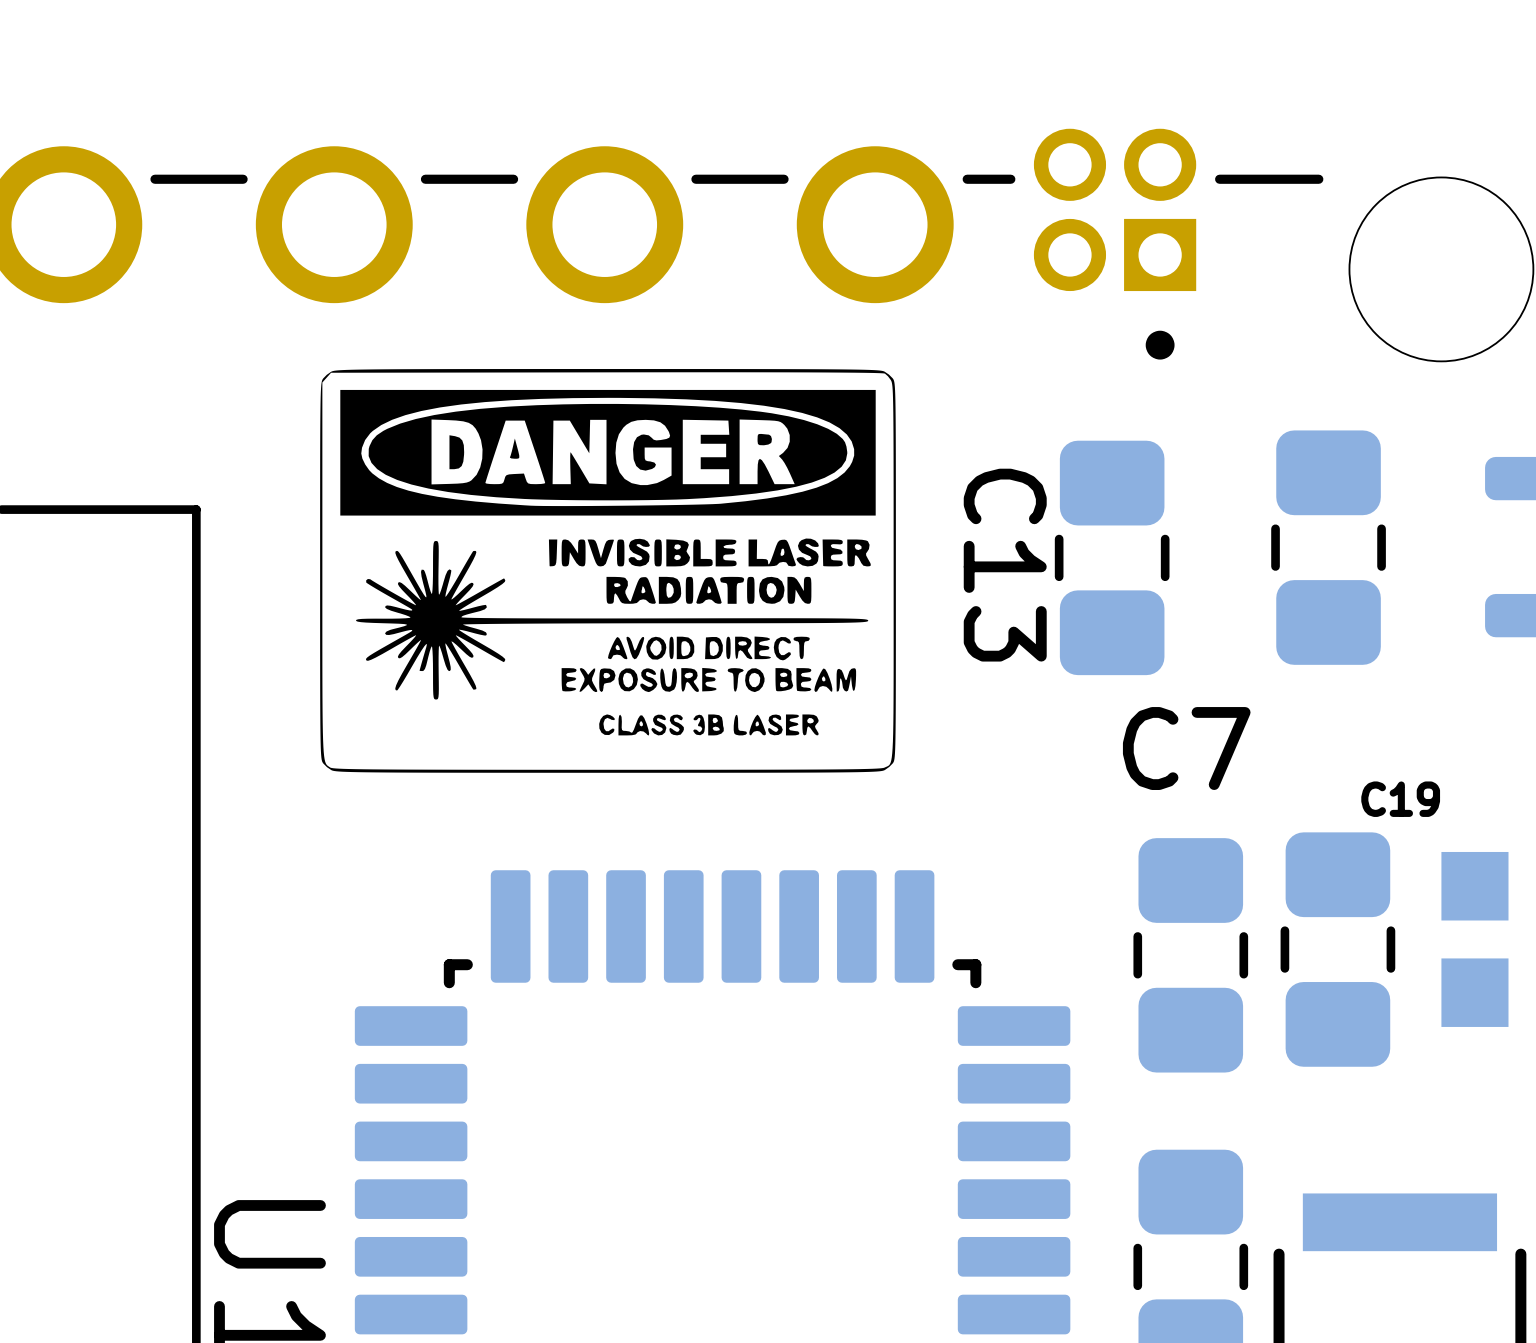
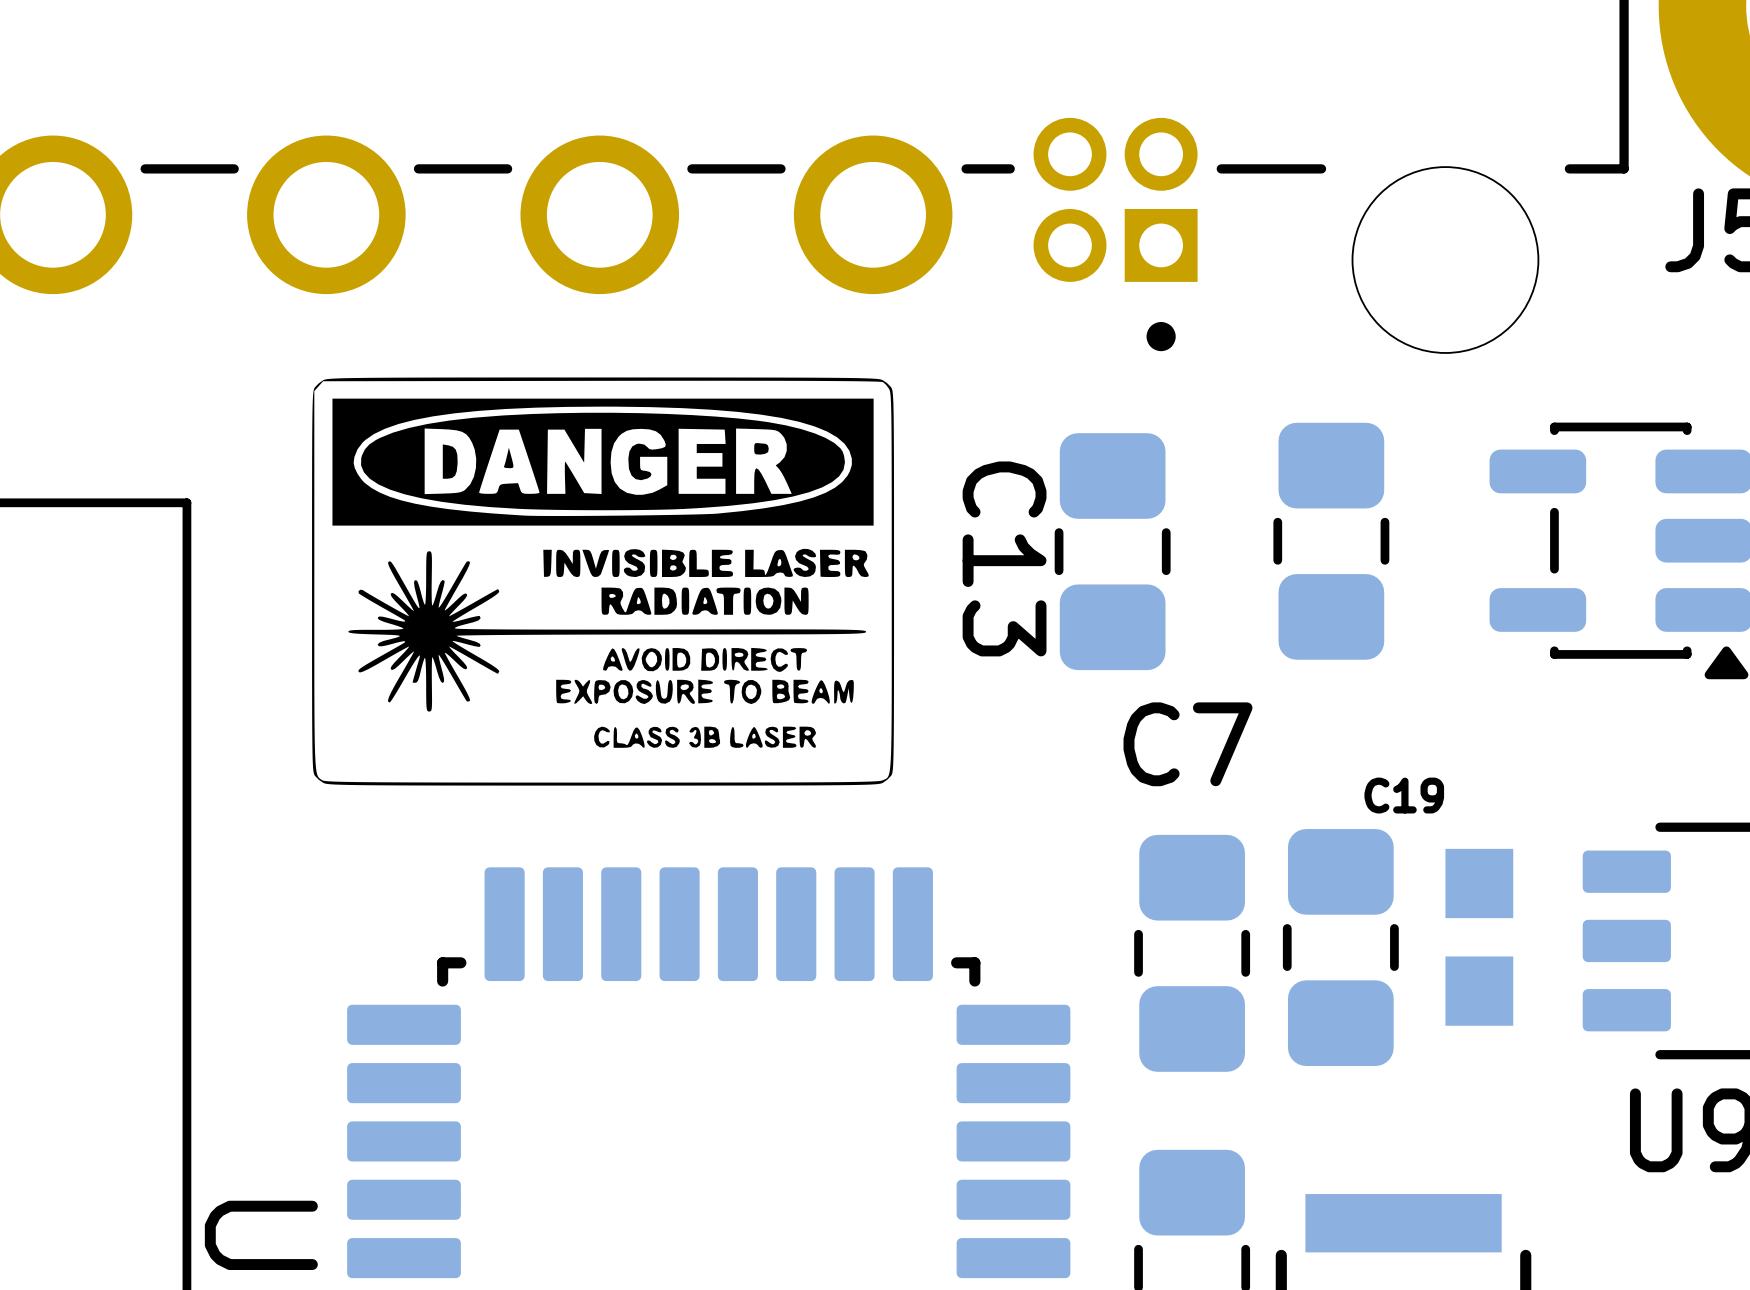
drawing position: (608, 570) -> (603, 581)

